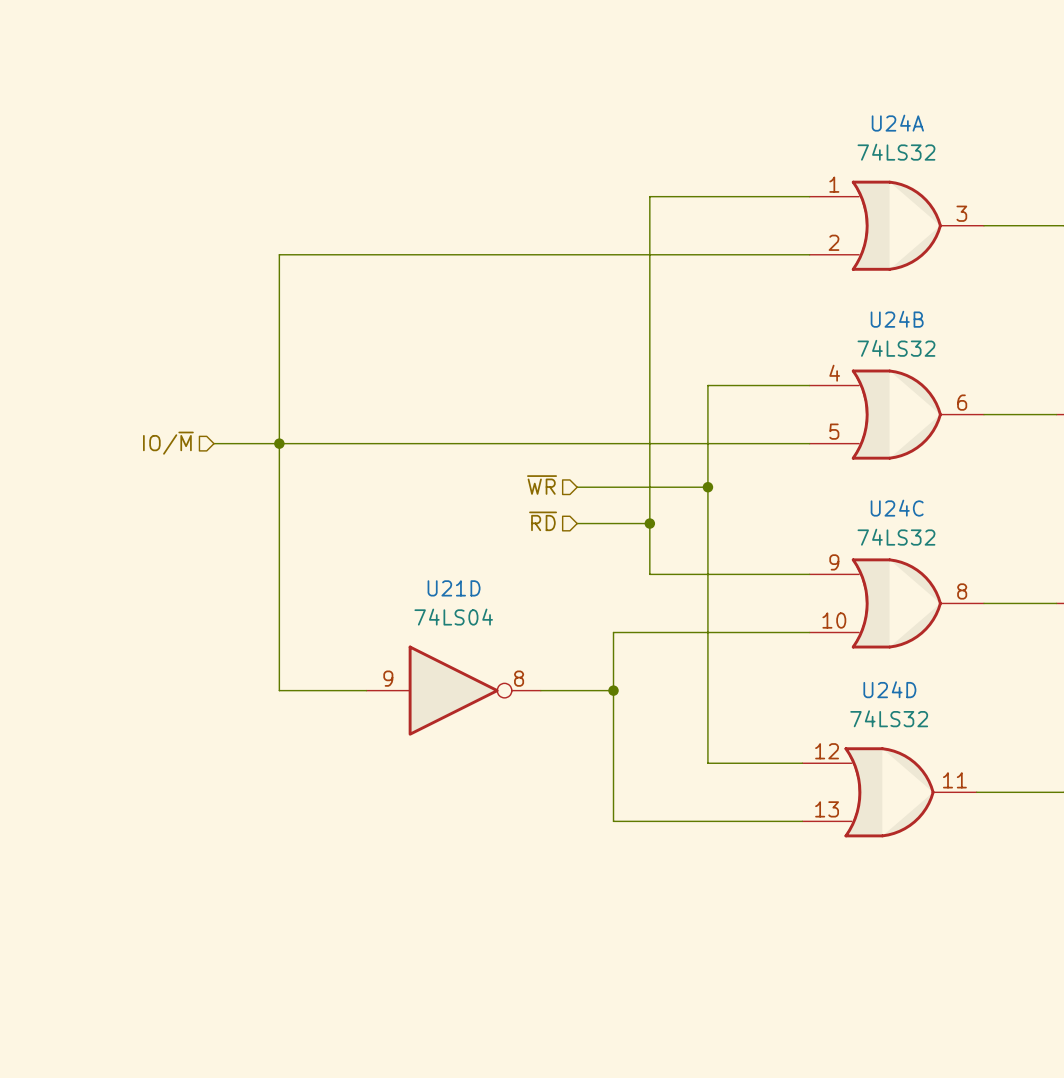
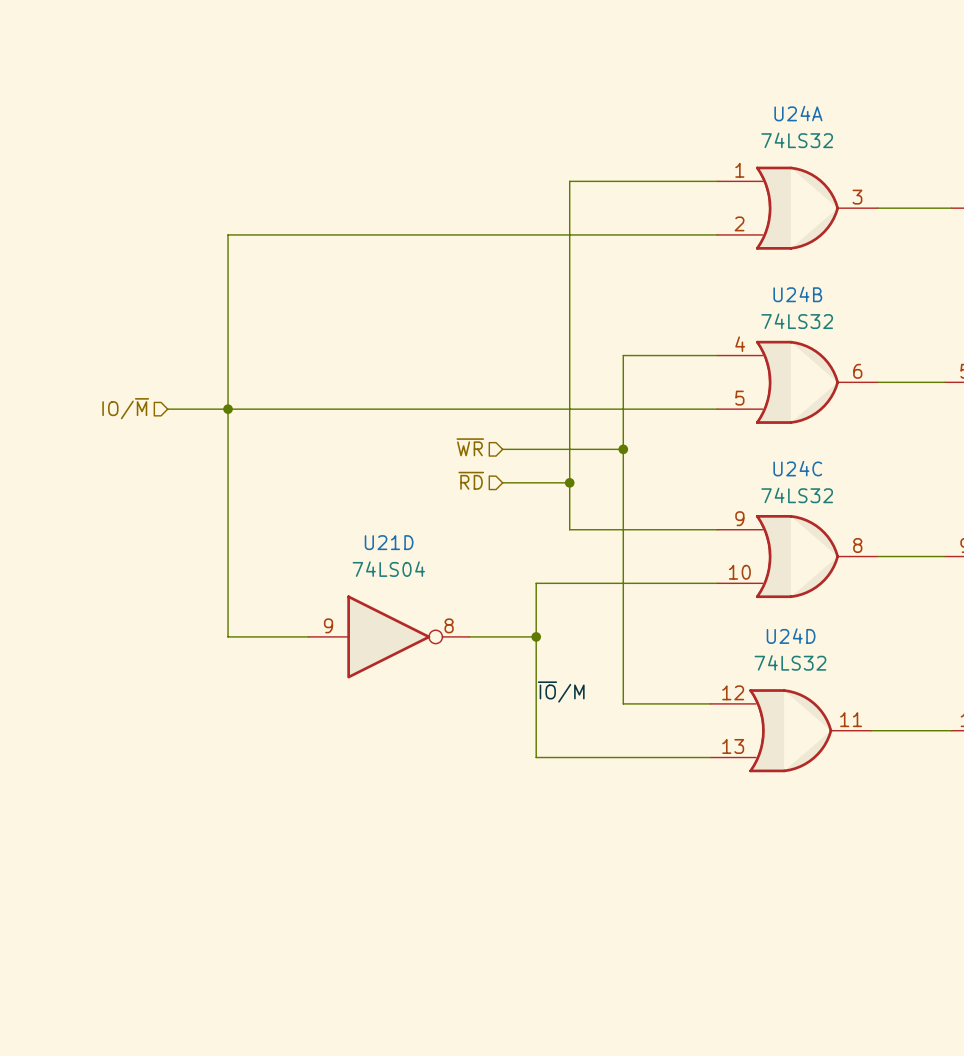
label: none -> ~{IO}/M (561, 692)

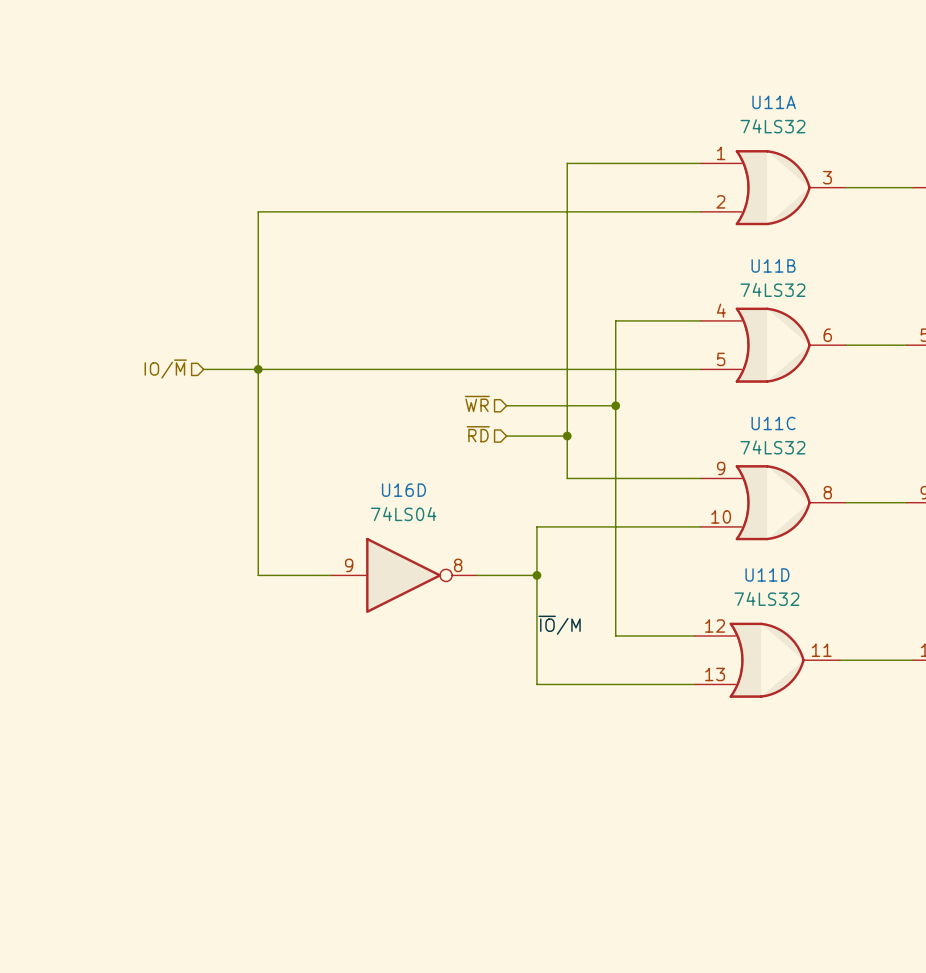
U24A name: U24A (798, 113) -> U11A (774, 102)
U24B name: U24B (797, 294) -> U11B (773, 265)
U24C name: U24C (797, 468) -> U11C (773, 423)
U21D name: U21D (389, 542) -> U16D (403, 490)
U24D name: U24D (791, 636) -> U11D (767, 574)

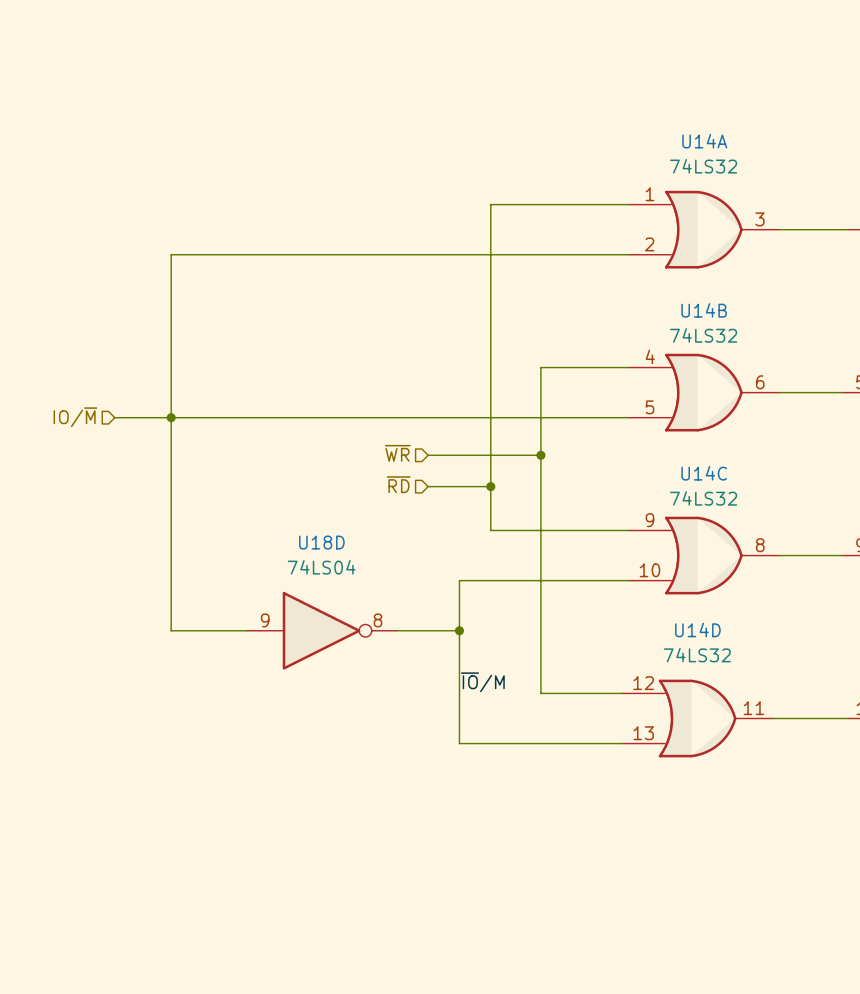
U11A name: U11A (774, 102) -> U14A (704, 141)
U11B name: U11B (773, 265) -> U14B (704, 310)
U11C name: U11C (773, 423) -> U14C (704, 473)
U16D name: U16D (403, 490) -> U18D (321, 542)
U11D name: U11D (767, 574) -> U14D (697, 629)

